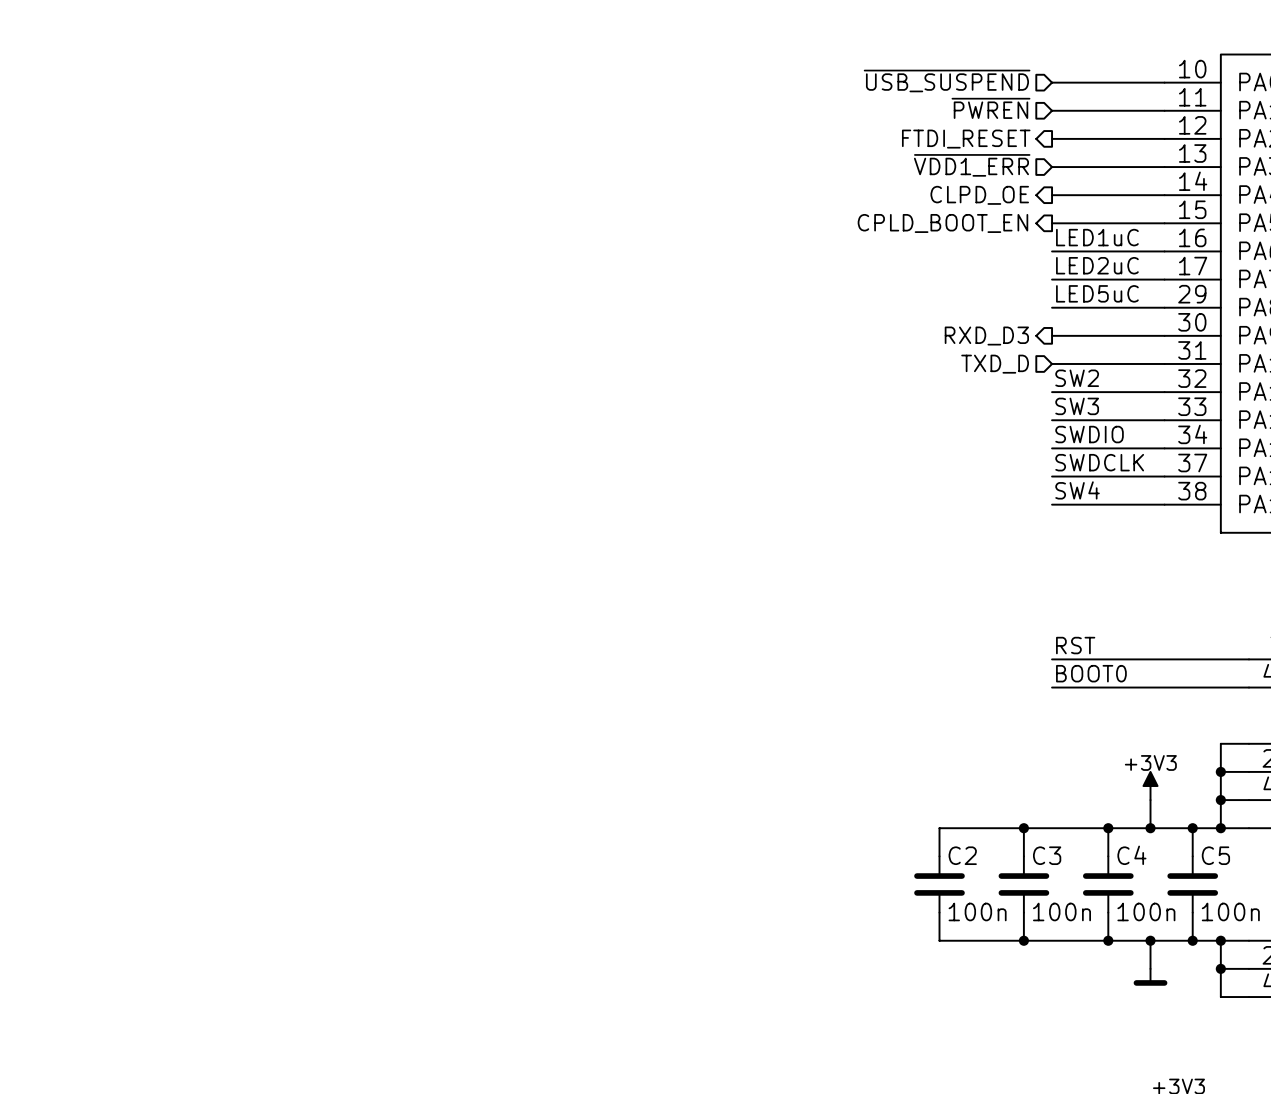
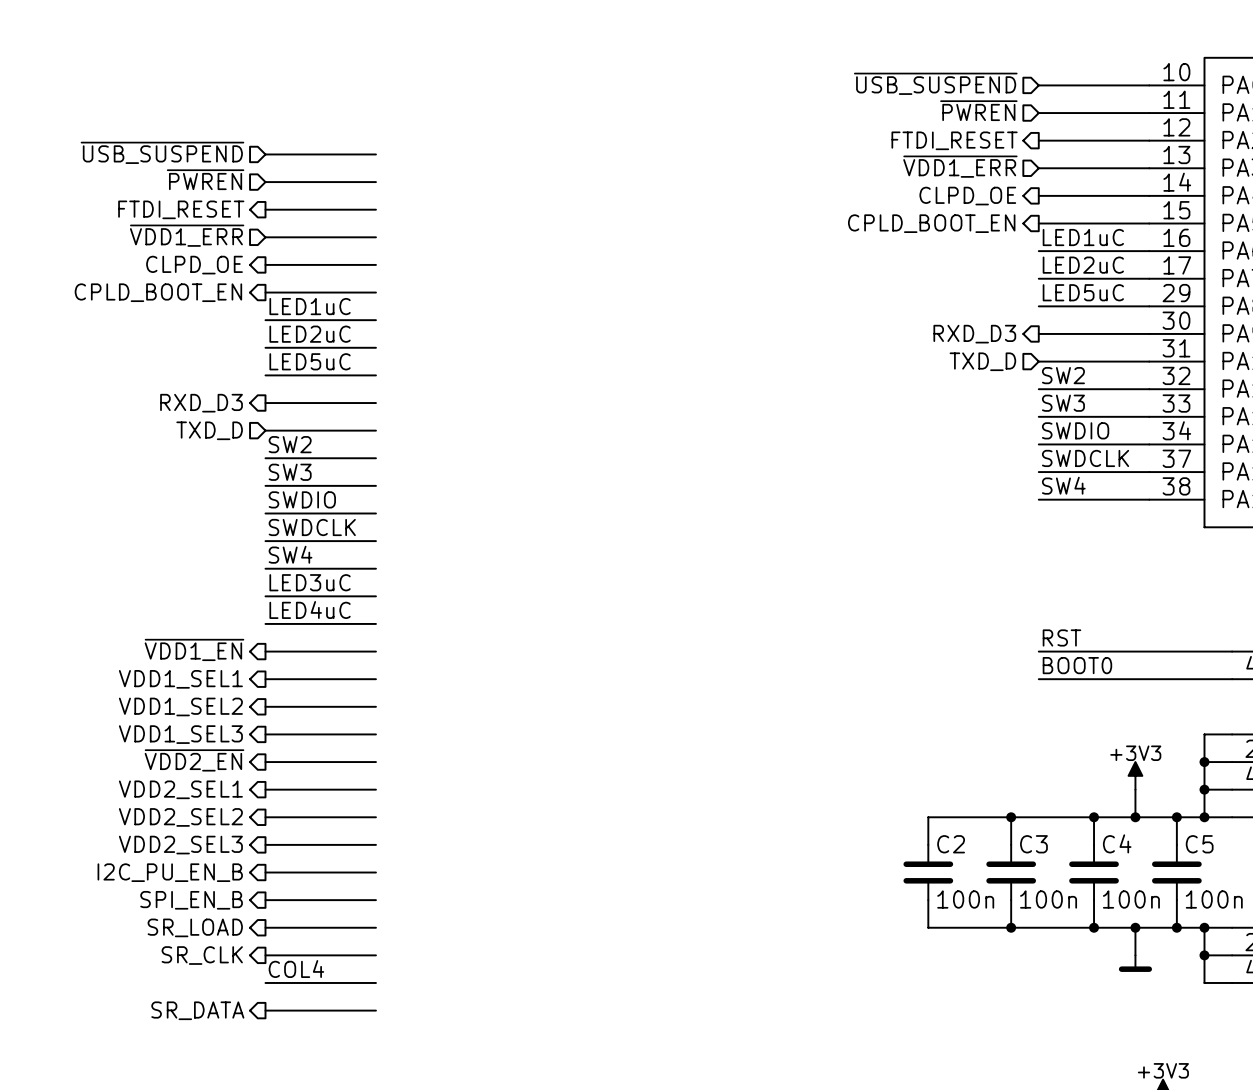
hierarchical label: none -> ~{USB_SUSPEND} (162, 152)
wire: none -> (265, 154) (375, 154)
hierarchical label: none -> ~{PWREN} (205, 179)
wire: none -> (265, 182) (375, 182)
hierarchical label: none -> FTDI_RESET (181, 209)
wire: none -> (265, 209) (375, 209)
hierarchical label: none -> ~{VDD1_ERR} (187, 235)
wire: none -> (265, 237) (375, 237)
hierarchical label: none -> CLPD_OE (194, 265)
wire: none -> (265, 264) (375, 264)
hierarchical label: none -> CPLD_BOOT_EN (158, 292)
wire: none -> (265, 292) (375, 292)
label: none -> LED1uC (310, 306)
wire: none -> (265, 320) (375, 320)
label: none -> LED2uC (310, 334)
wire: none -> (265, 347) (375, 347)
label: none -> LED5uC (310, 361)
wire: none -> (265, 375) (375, 375)
hierarchical label: none -> RXD_D3 (201, 403)
wire: none -> (265, 403) (375, 403)
hierarchical label: none -> TXD_D (209, 430)
wire: none -> (265, 430) (375, 430)
label: none -> SW2 (290, 444)
wire: none -> (265, 458) (375, 458)
label: none -> SW3 (290, 472)
wire: none -> (265, 485) (375, 485)
label: none -> SWDIO (302, 499)
wire: none -> (265, 513) (375, 513)
label: none -> SWDCLK (312, 527)
wire: none -> (265, 541) (375, 541)
label: none -> SW4 (290, 554)
wire: none -> (265, 568) (375, 568)
label: none -> LED3uC (310, 582)
wire: none -> (265, 596) (375, 596)
label: none -> LED4uC (310, 609)
wire: none -> (265, 623) (375, 623)
hierarchical label: none -> ~{VDD1_EN} (194, 649)
wire: none -> (265, 651) (375, 651)
hierarchical label: none -> VDD1_SEL1 (180, 679)
wire: none -> (265, 679) (375, 679)
hierarchical label: none -> VDD1_SEL2 (180, 706)
wire: none -> (265, 706) (375, 706)
hierarchical label: none -> VDD1_SEL3 (180, 734)
wire: none -> (265, 734) (375, 734)
hierarchical label: none -> ~{VDD2_EN} (194, 760)
wire: none -> (265, 762) (375, 762)
hierarchical label: none -> VDD2_SEL1 (180, 789)
wire: none -> (265, 789) (375, 789)
hierarchical label: none -> VDD2_SEL2 (180, 817)
wire: none -> (265, 817) (375, 817)
hierarchical label: none -> VDD2_SEL3 (180, 845)
wire: none -> (265, 844) (375, 844)
hierarchical label: none -> I2C_PU_EN_B (170, 872)
wire: none -> (265, 872) (375, 872)
hierarchical label: none -> SPI_EN_B (191, 900)
wire: none -> (265, 900) (375, 900)
hierarchical label: none -> SR_LOAD (195, 927)
wire: none -> (265, 927) (375, 927)
wire: none -> (265, 955) (375, 955)
hierarchical label: none -> SR_CLK (202, 955)
label: none -> COL4 (296, 969)
wire: none -> (265, 982) (375, 982)
hierarchical label: none -> SR_DATA (197, 1010)
wire: none -> (265, 1010) (375, 1010)

